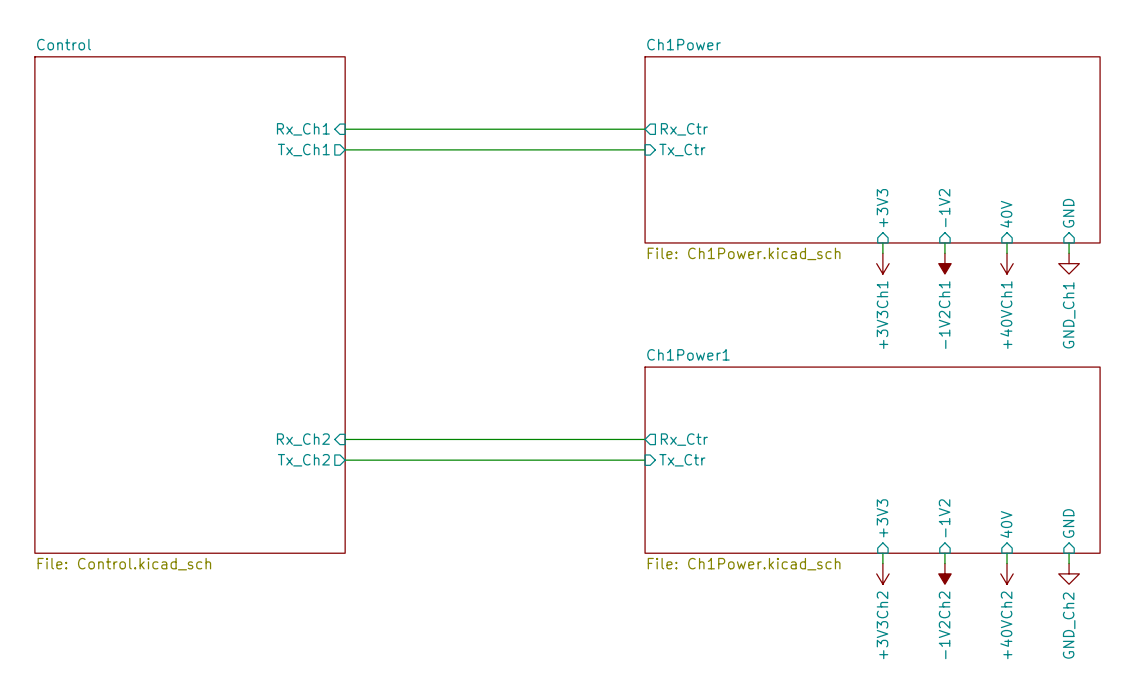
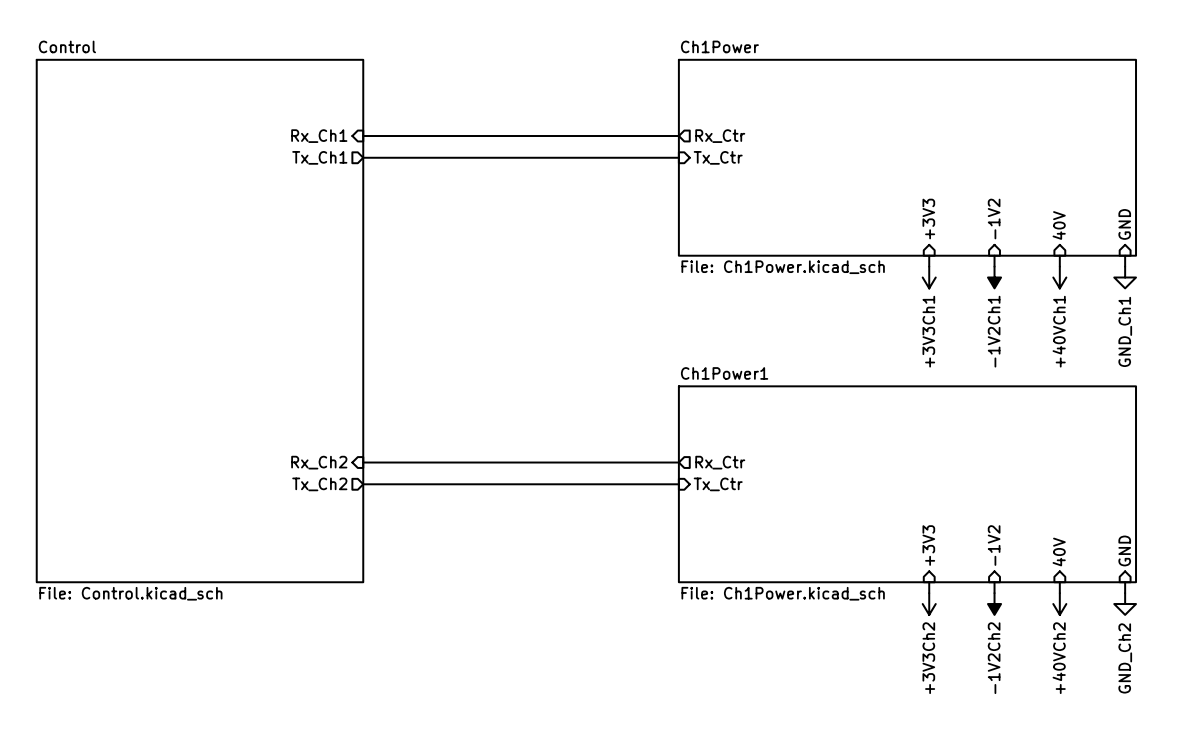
sheet Ch1Power shape: [644, 56, 1101, 244] -> [678, 59, 1137, 257]
sheet Ch1Power1 shape: [644, 366, 1101, 554] -> [678, 385, 1137, 583]

